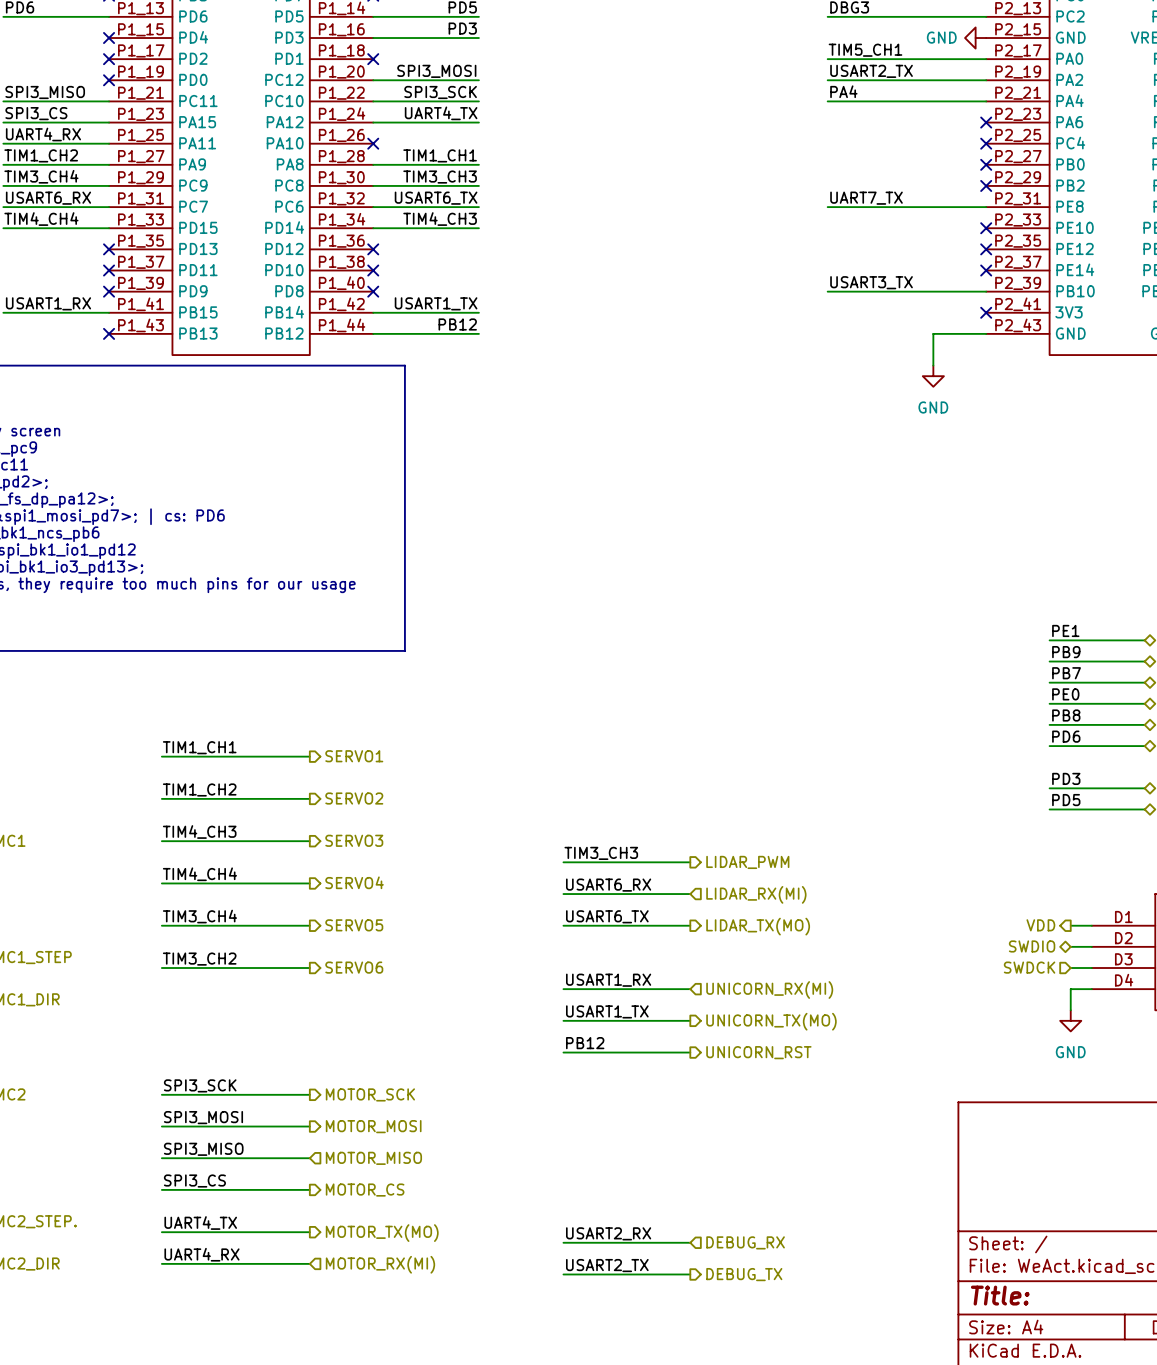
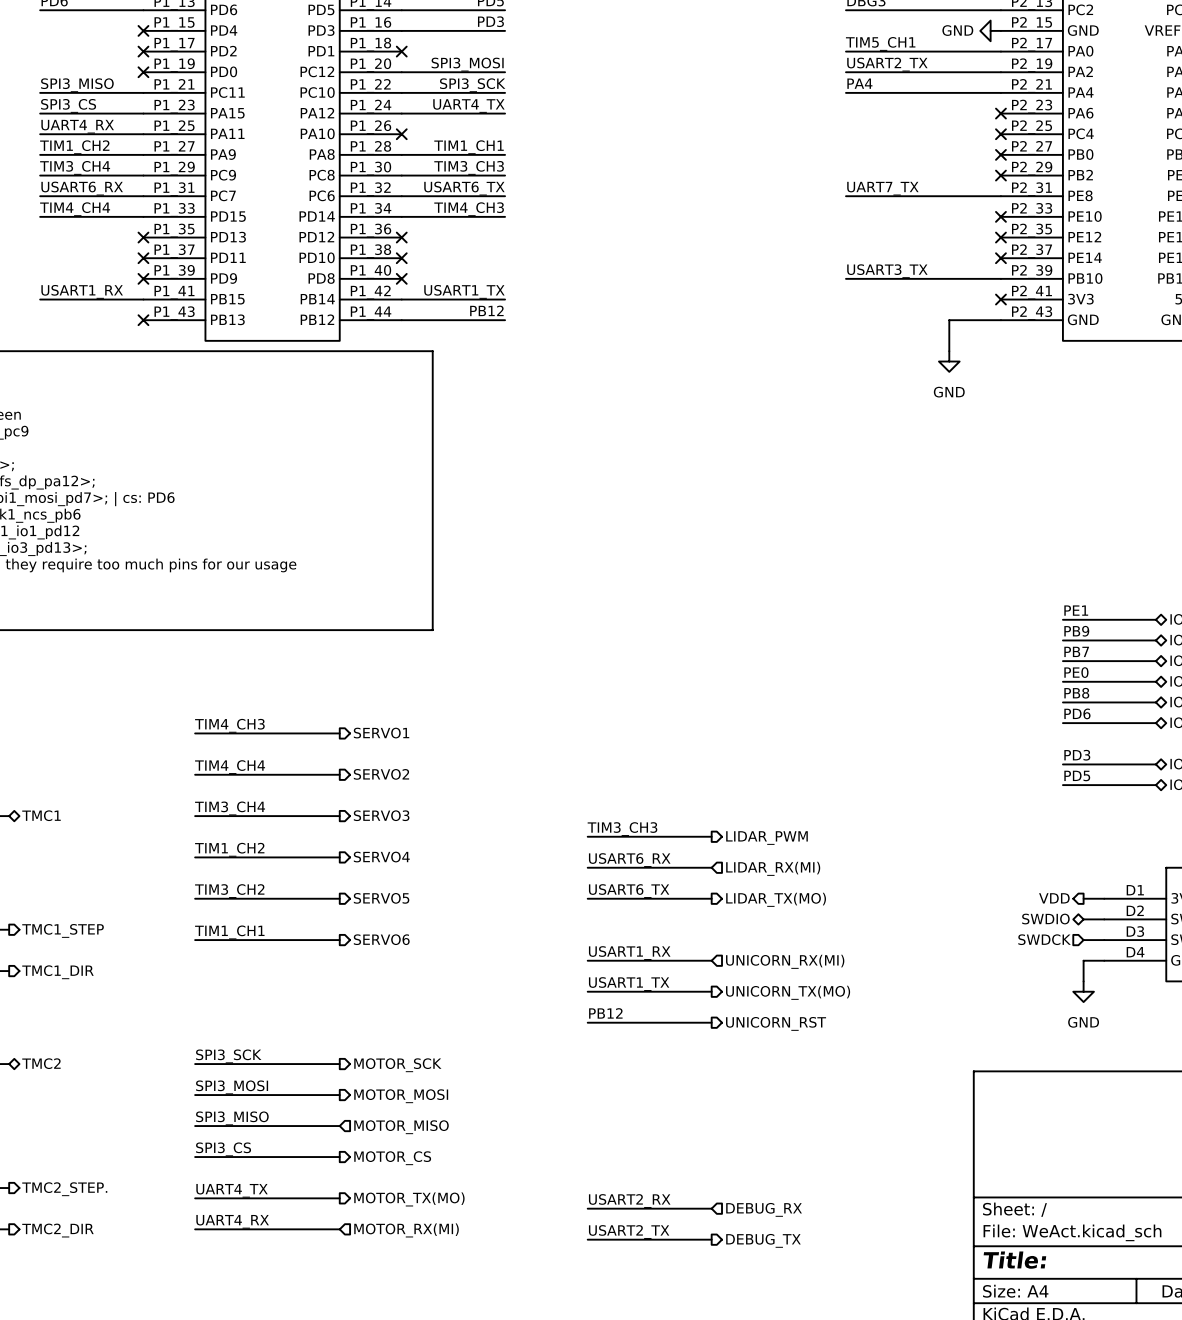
label: TIM1_CH1 (199, 747) -> TIM4_CH3 (229, 725)
label: TIM1_CH2 (199, 789) -> TIM4_CH4 (230, 767)
label: TIM4_CH3 (199, 832) -> TIM3_CH4 (230, 808)
label: TIM4_CH4 (199, 874) -> TIM1_CH2 (229, 849)
label: TIM3_CH4 (199, 916) -> TIM3_CH2 (229, 891)
label: TIM3_CH2 (199, 959) -> TIM1_CH1 (229, 932)

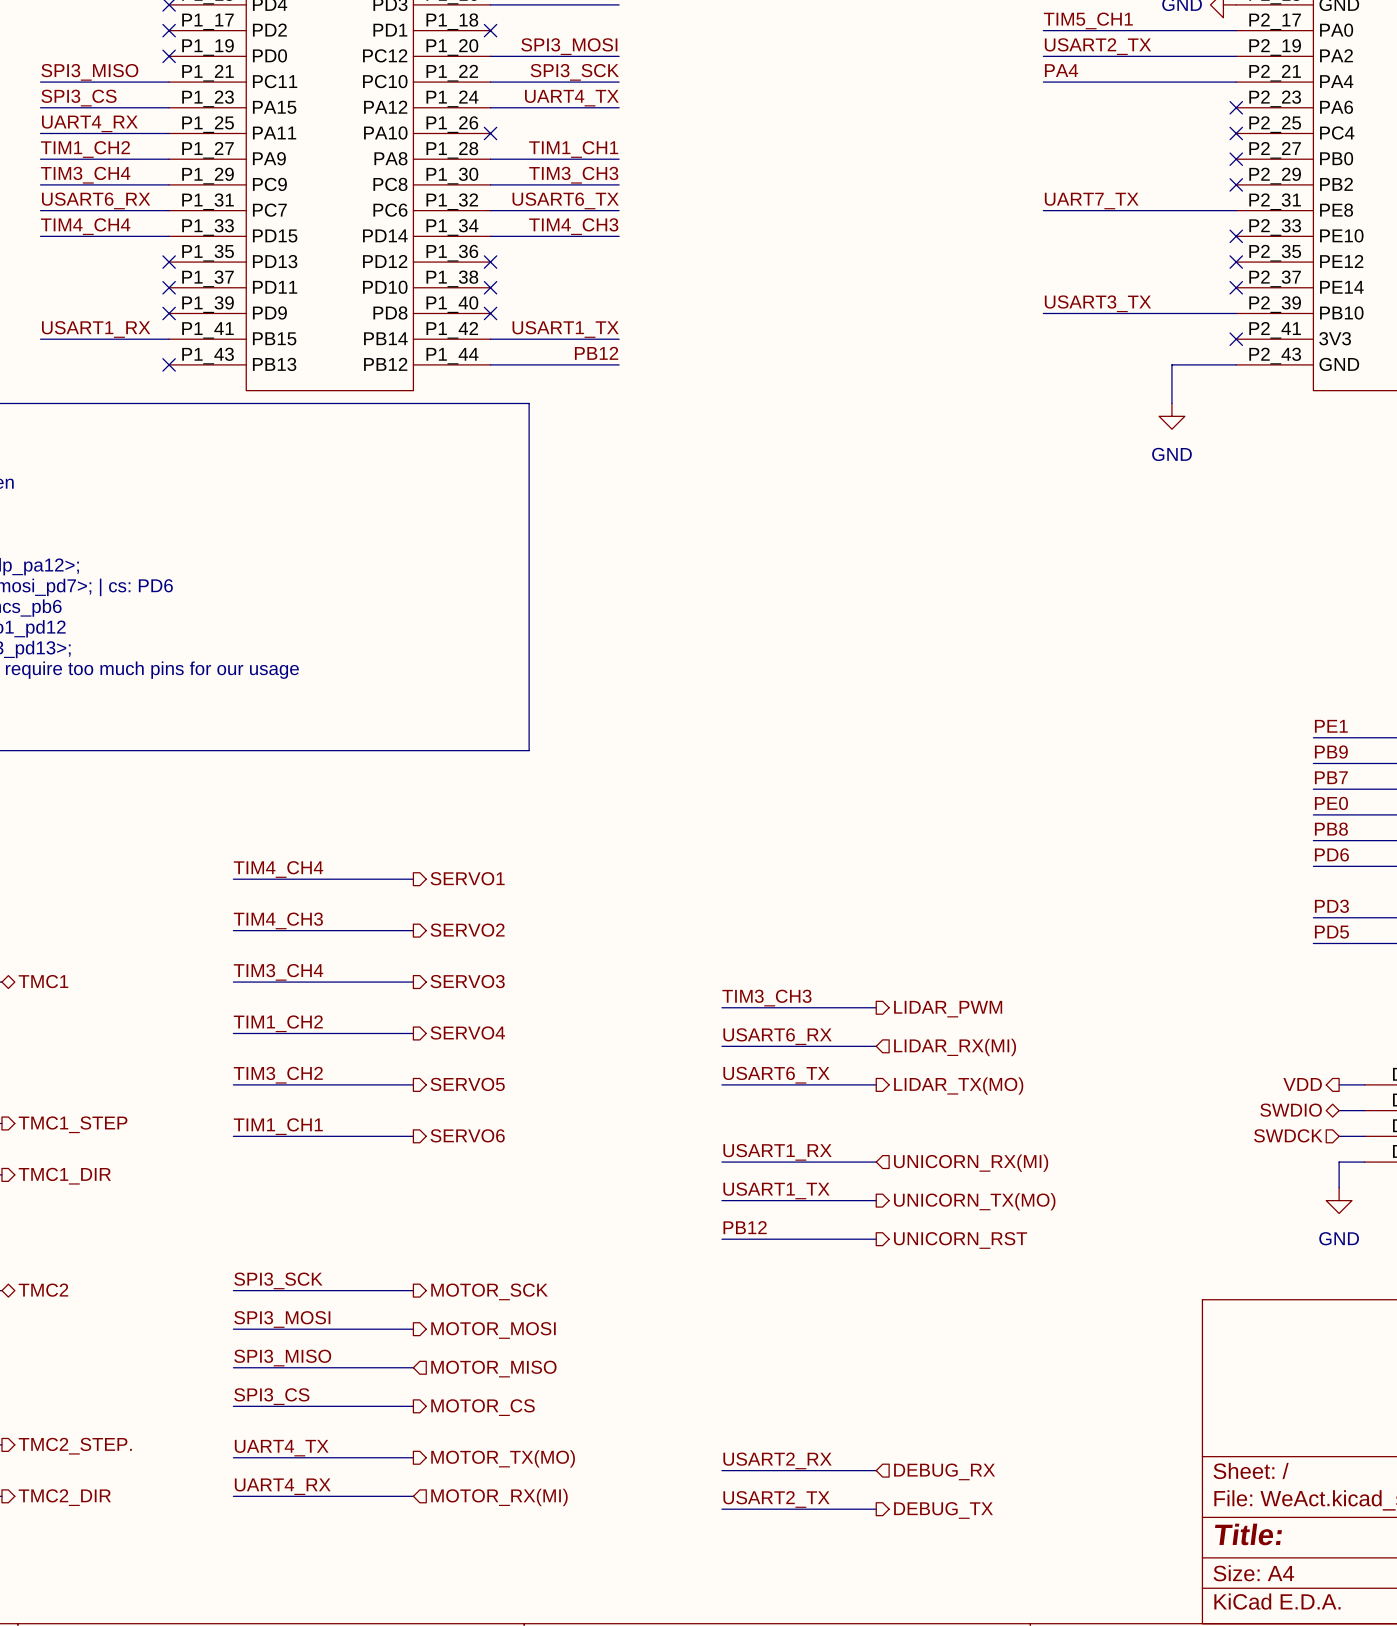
label: TIM4_CH3 (229, 725) -> TIM4_CH4 (278, 869)
label: TIM4_CH4 (230, 767) -> TIM4_CH3 (278, 920)

